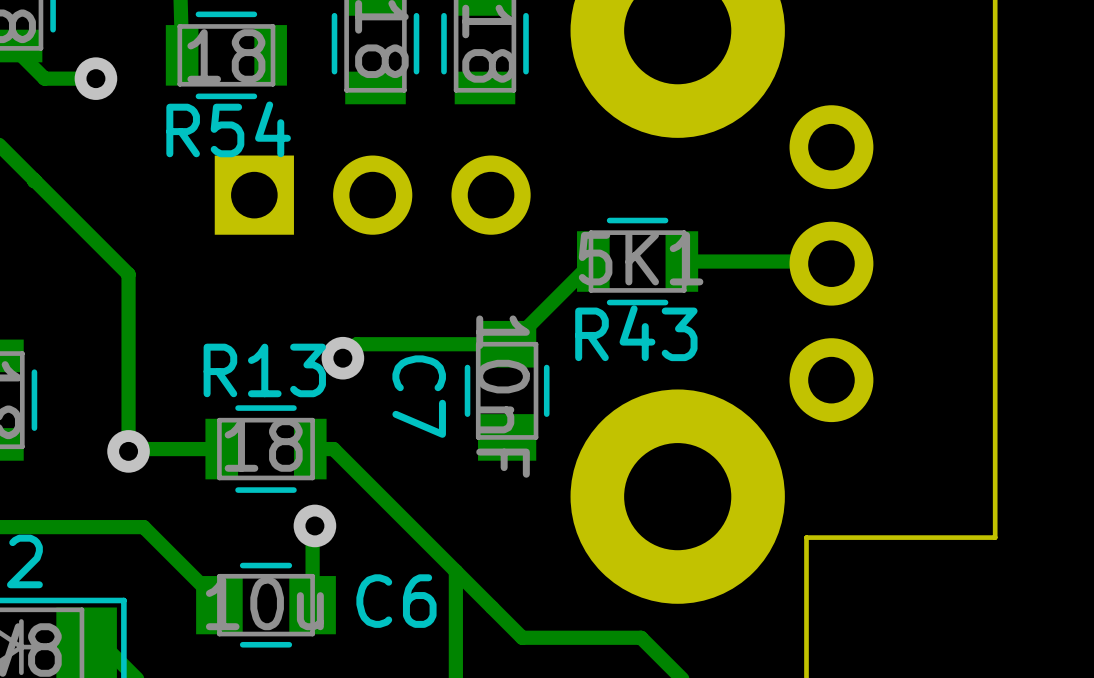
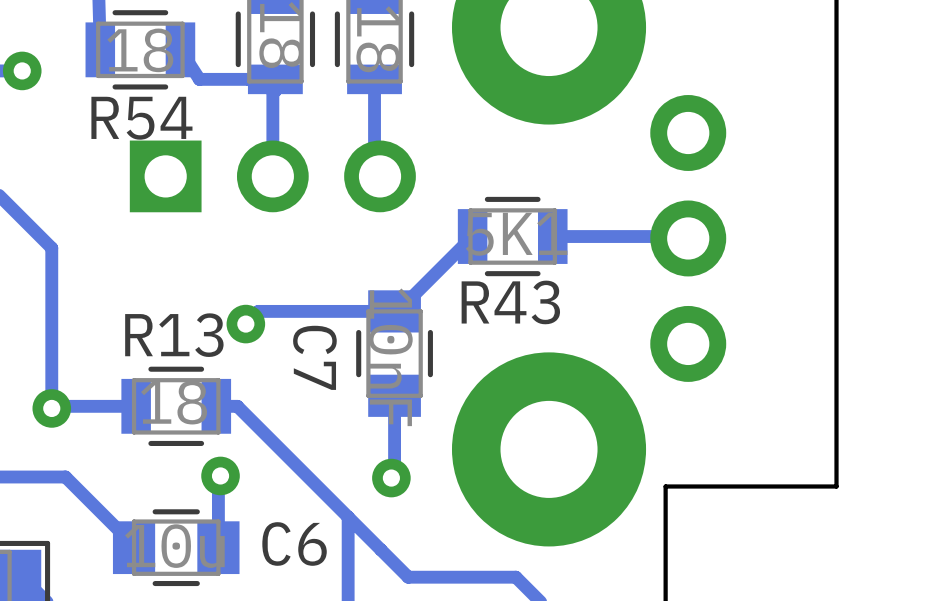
track: none -> (180, 49) (199, 79) (275, 79)
track: none -> (275, 79) (272, 81) (272, 176)
track: none -> (374, 79) (374, 165) (380, 172) (382, 170)
track: none -> (394, 395) (394, 474) (391, 478)
via: none -> (391, 478)

